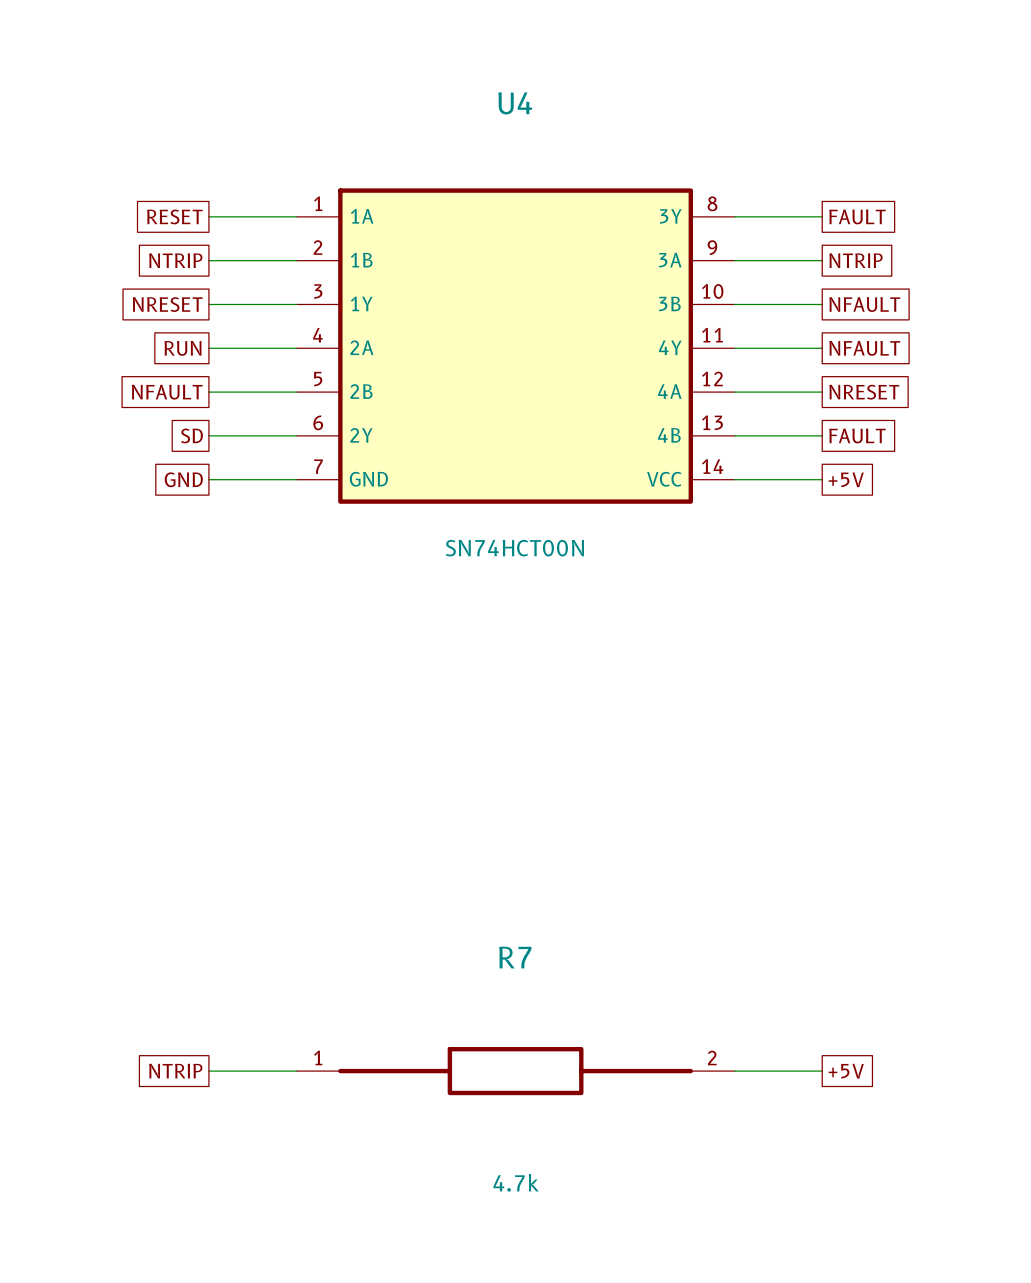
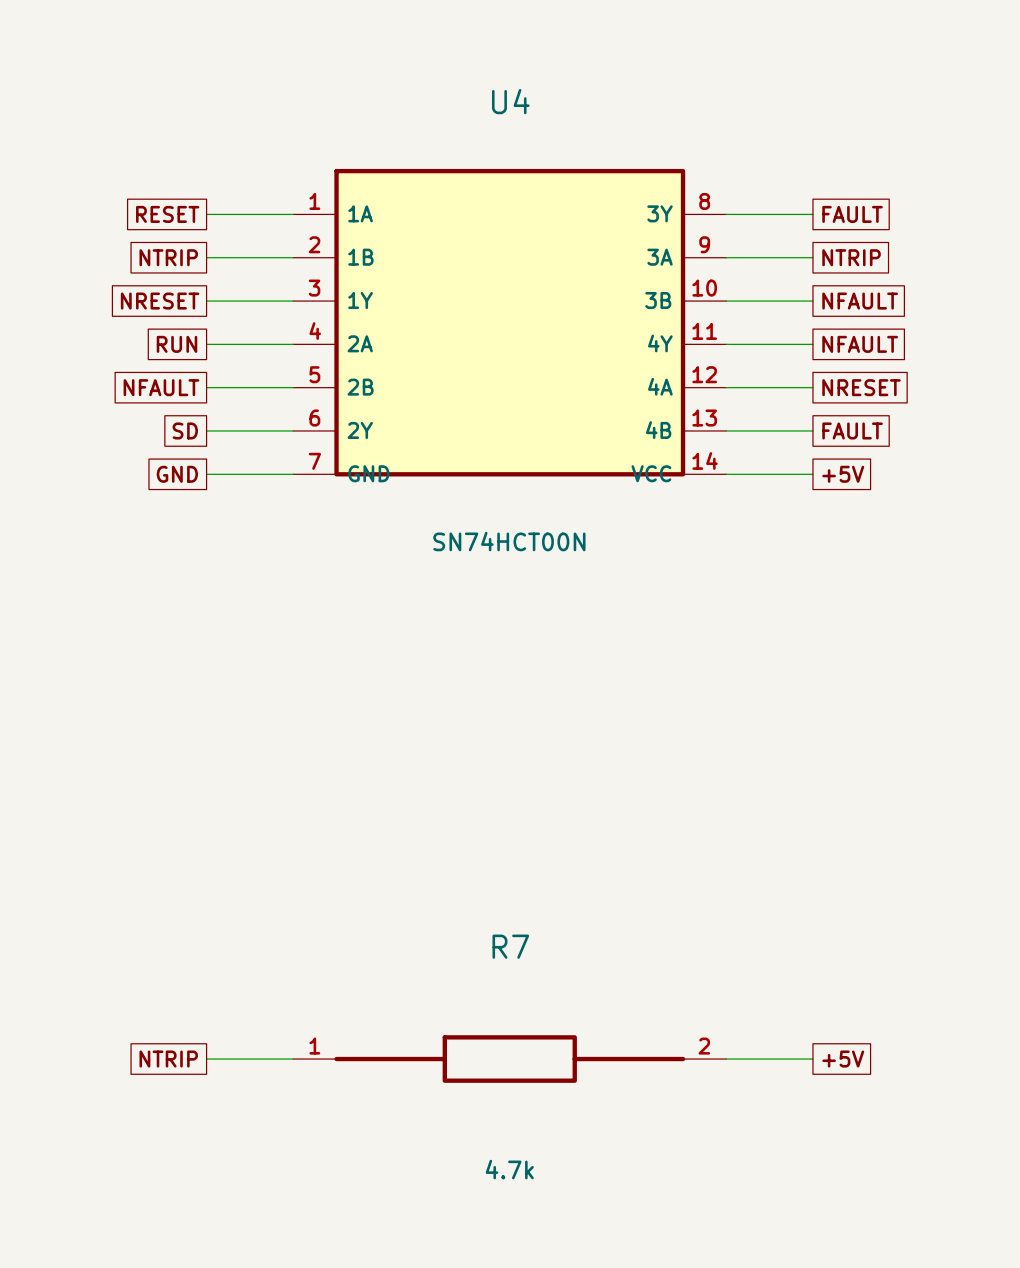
U4 symbol: [296, 188, 735, 504] -> [293, 168, 727, 477]

